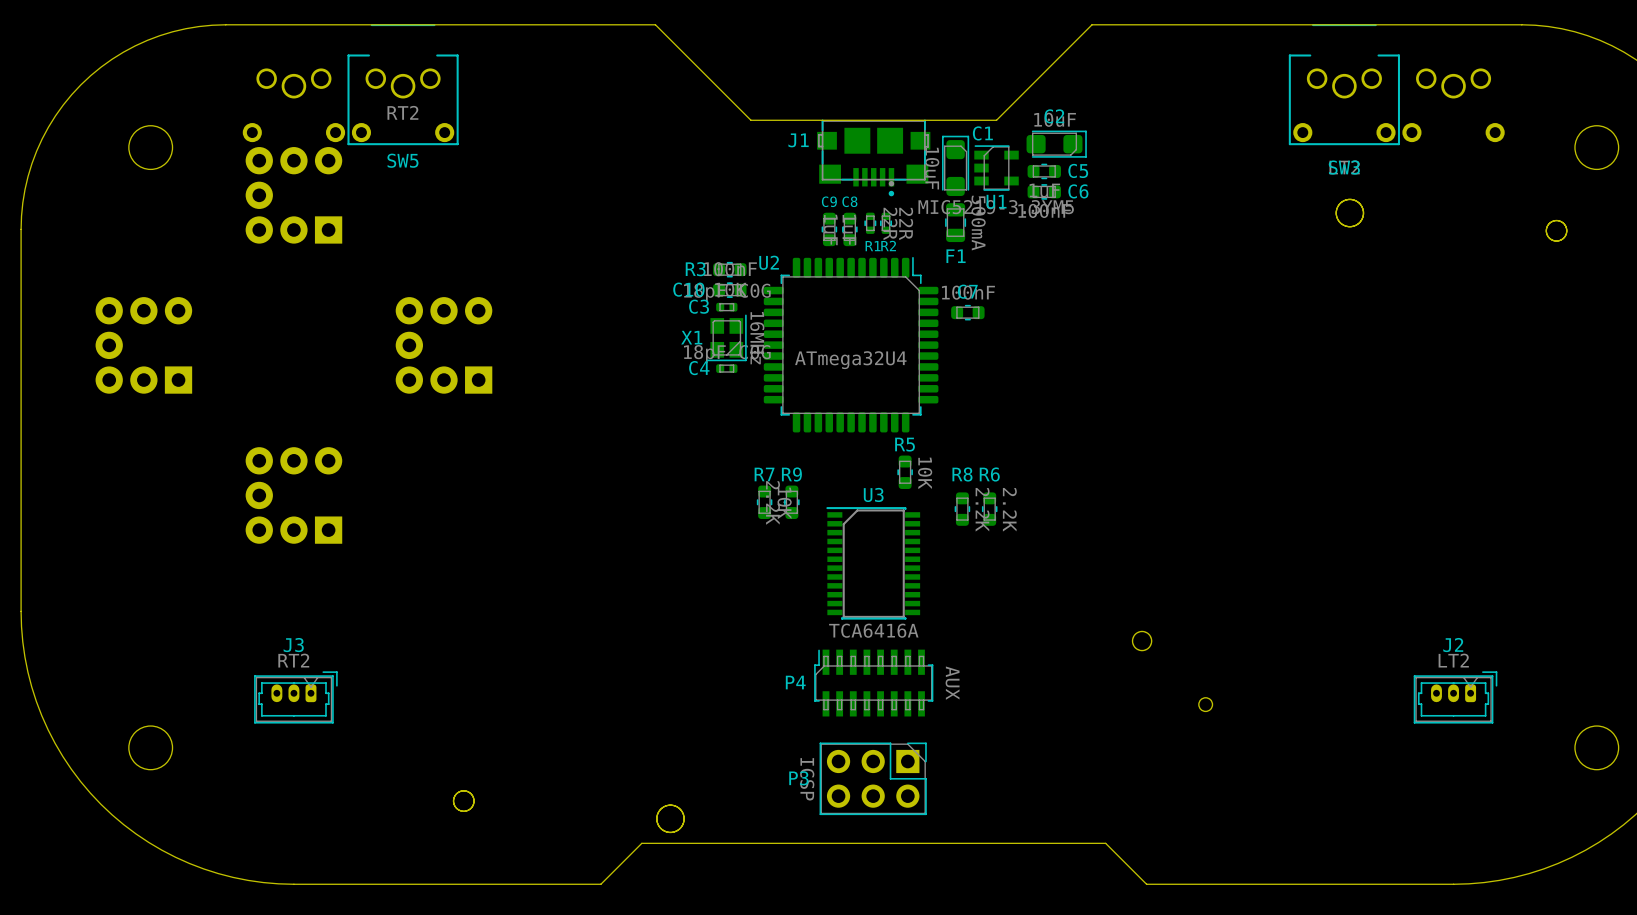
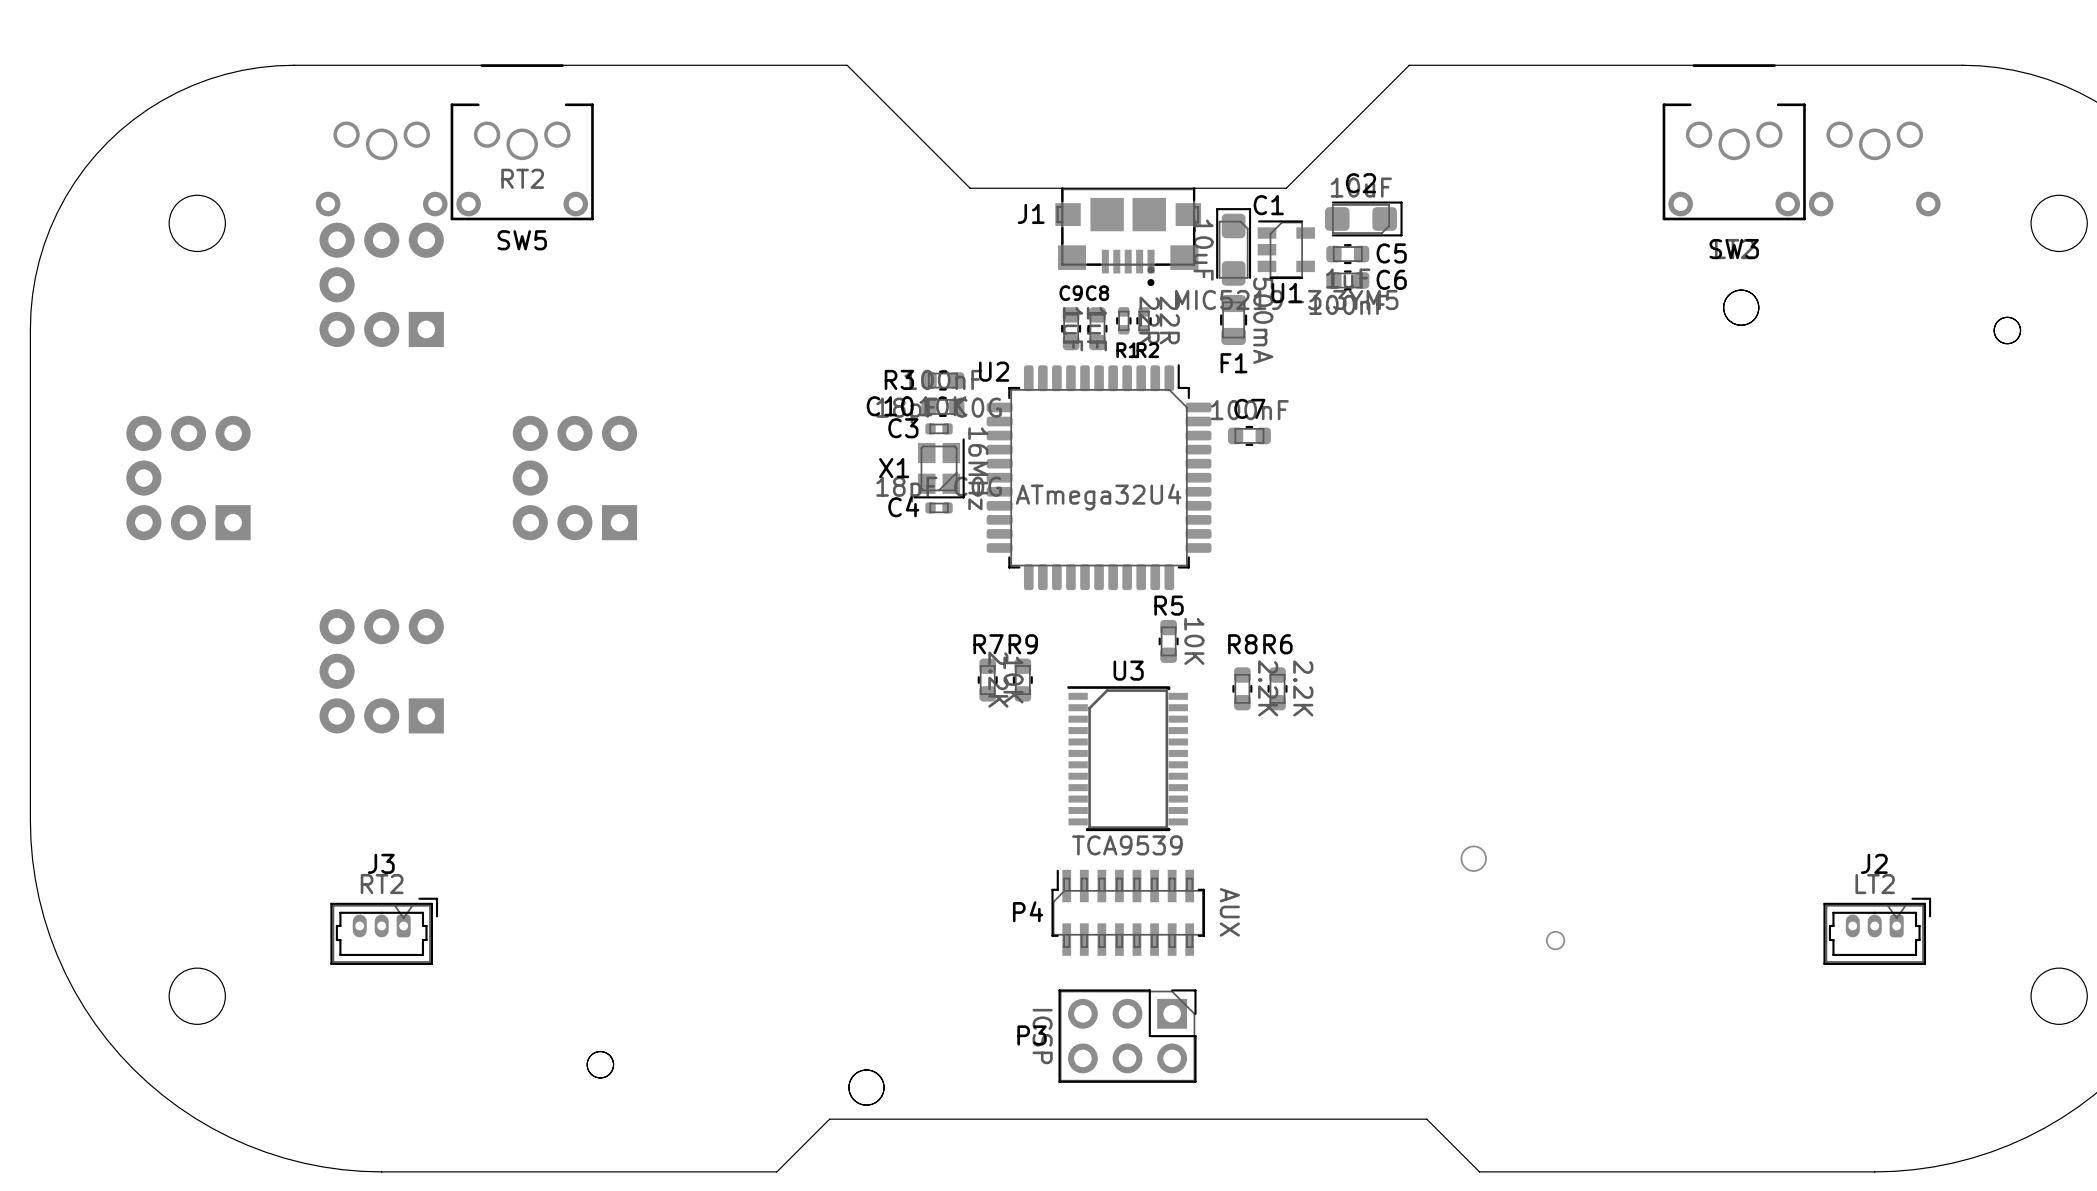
U3 value: TCA6416A (873, 630) -> TCA9539 (1127, 845)

